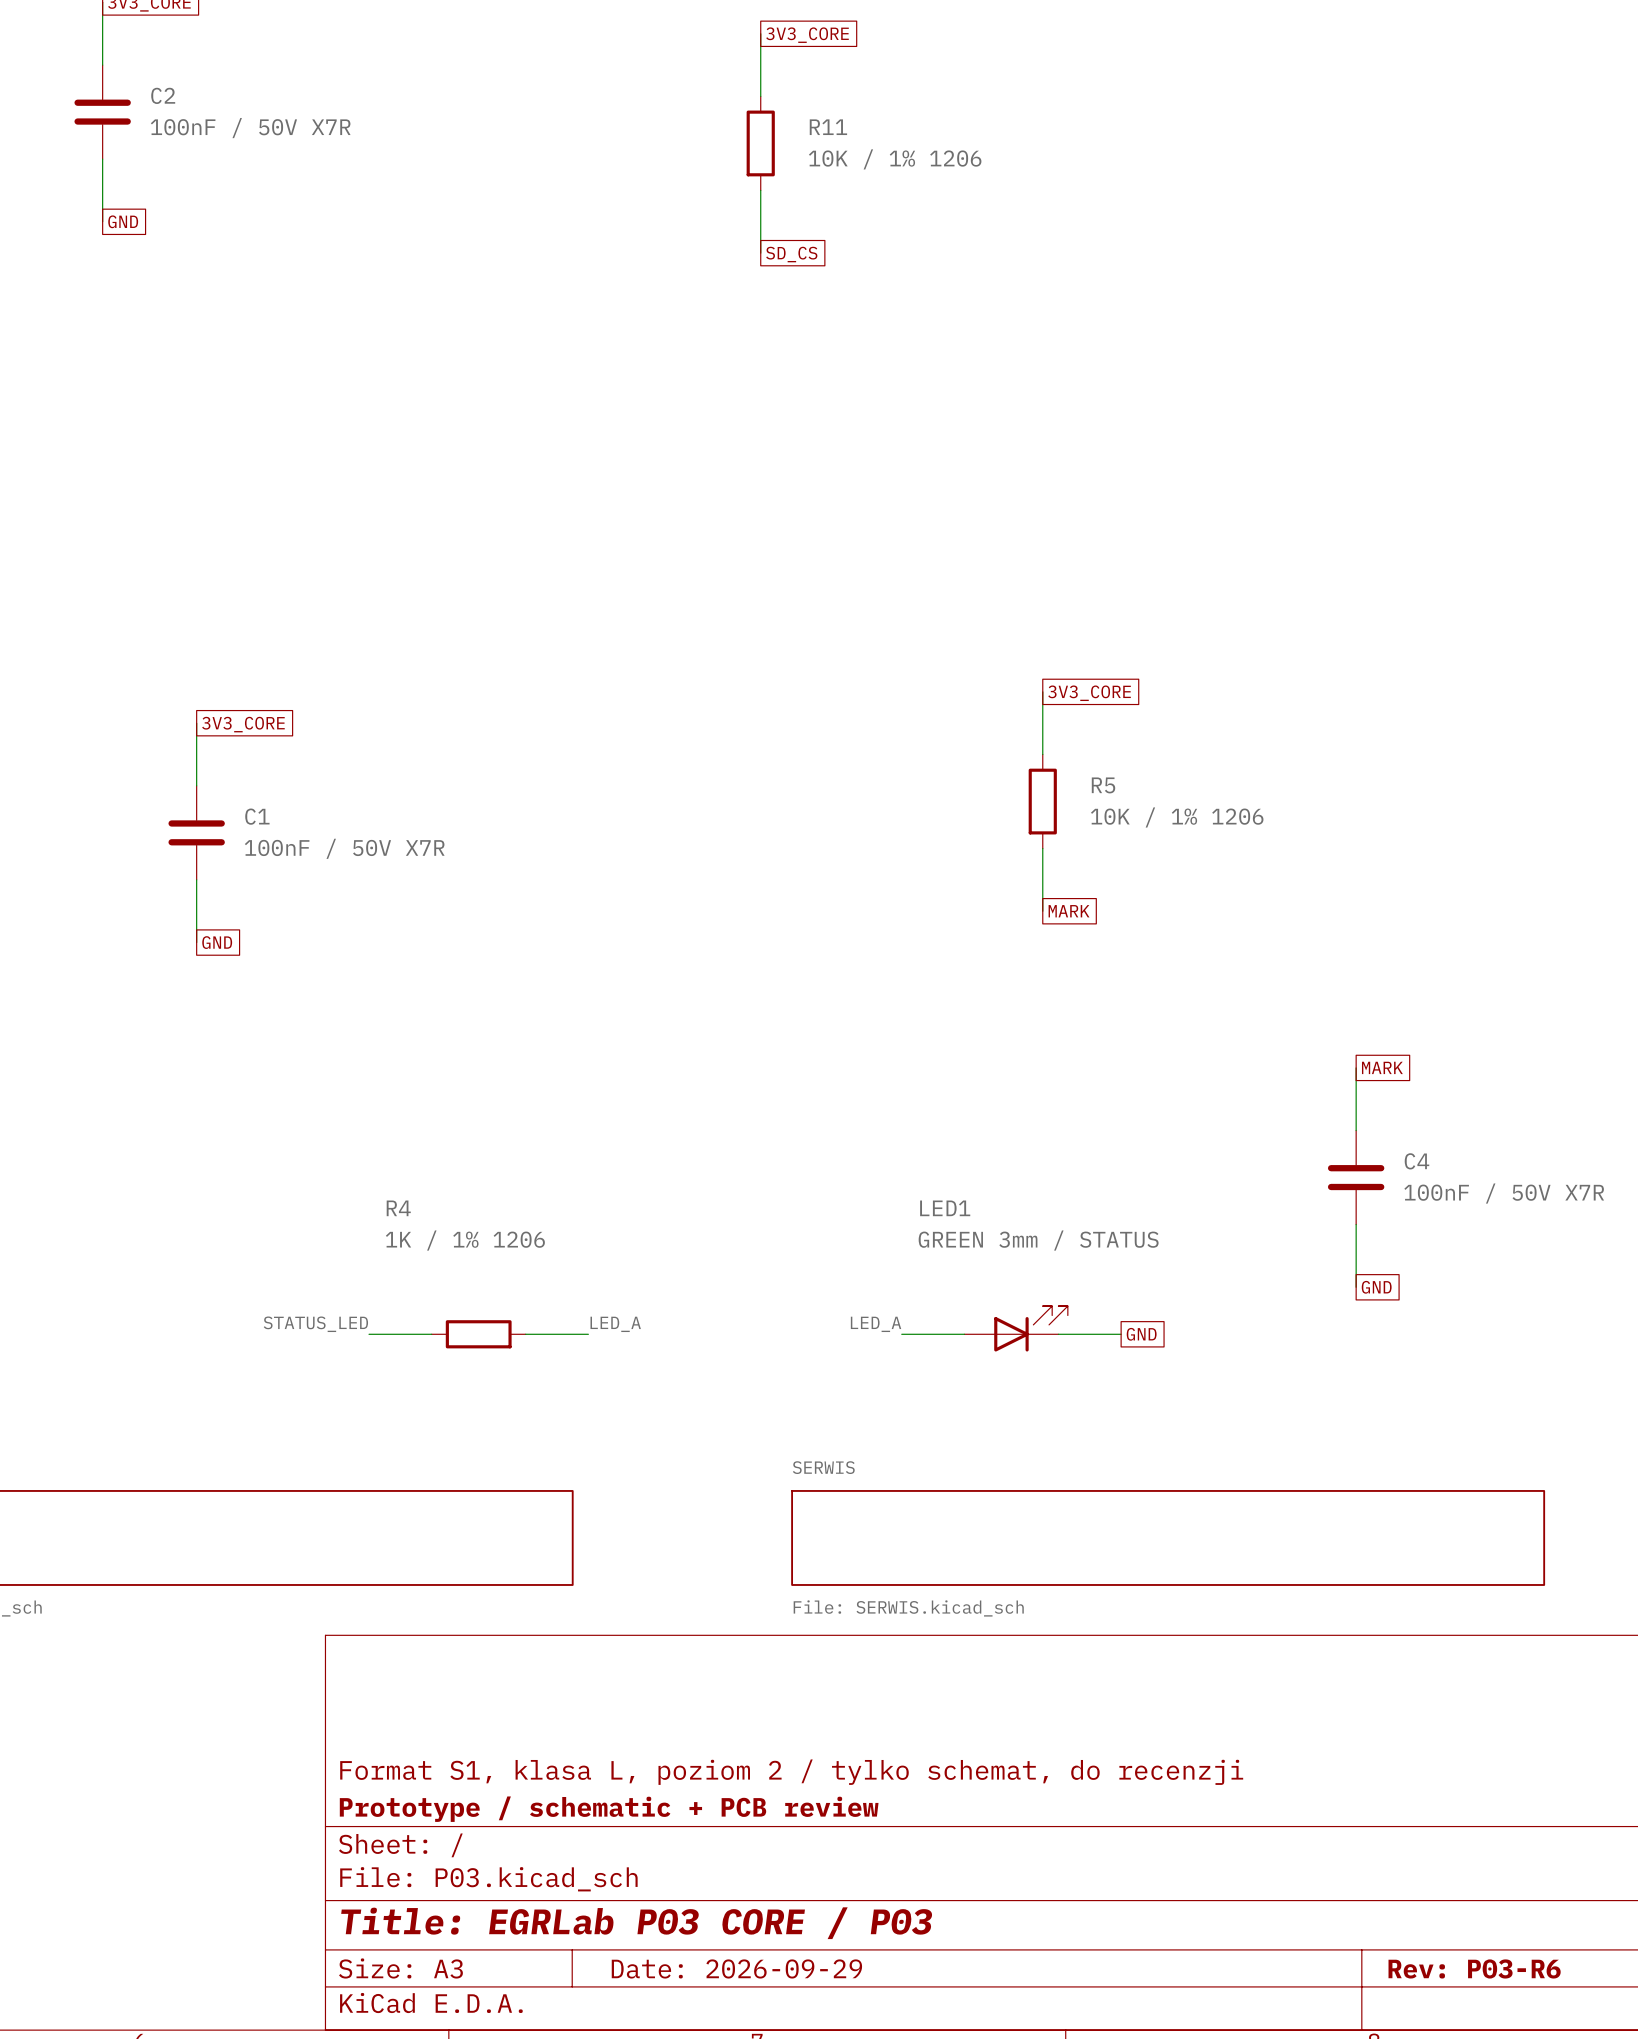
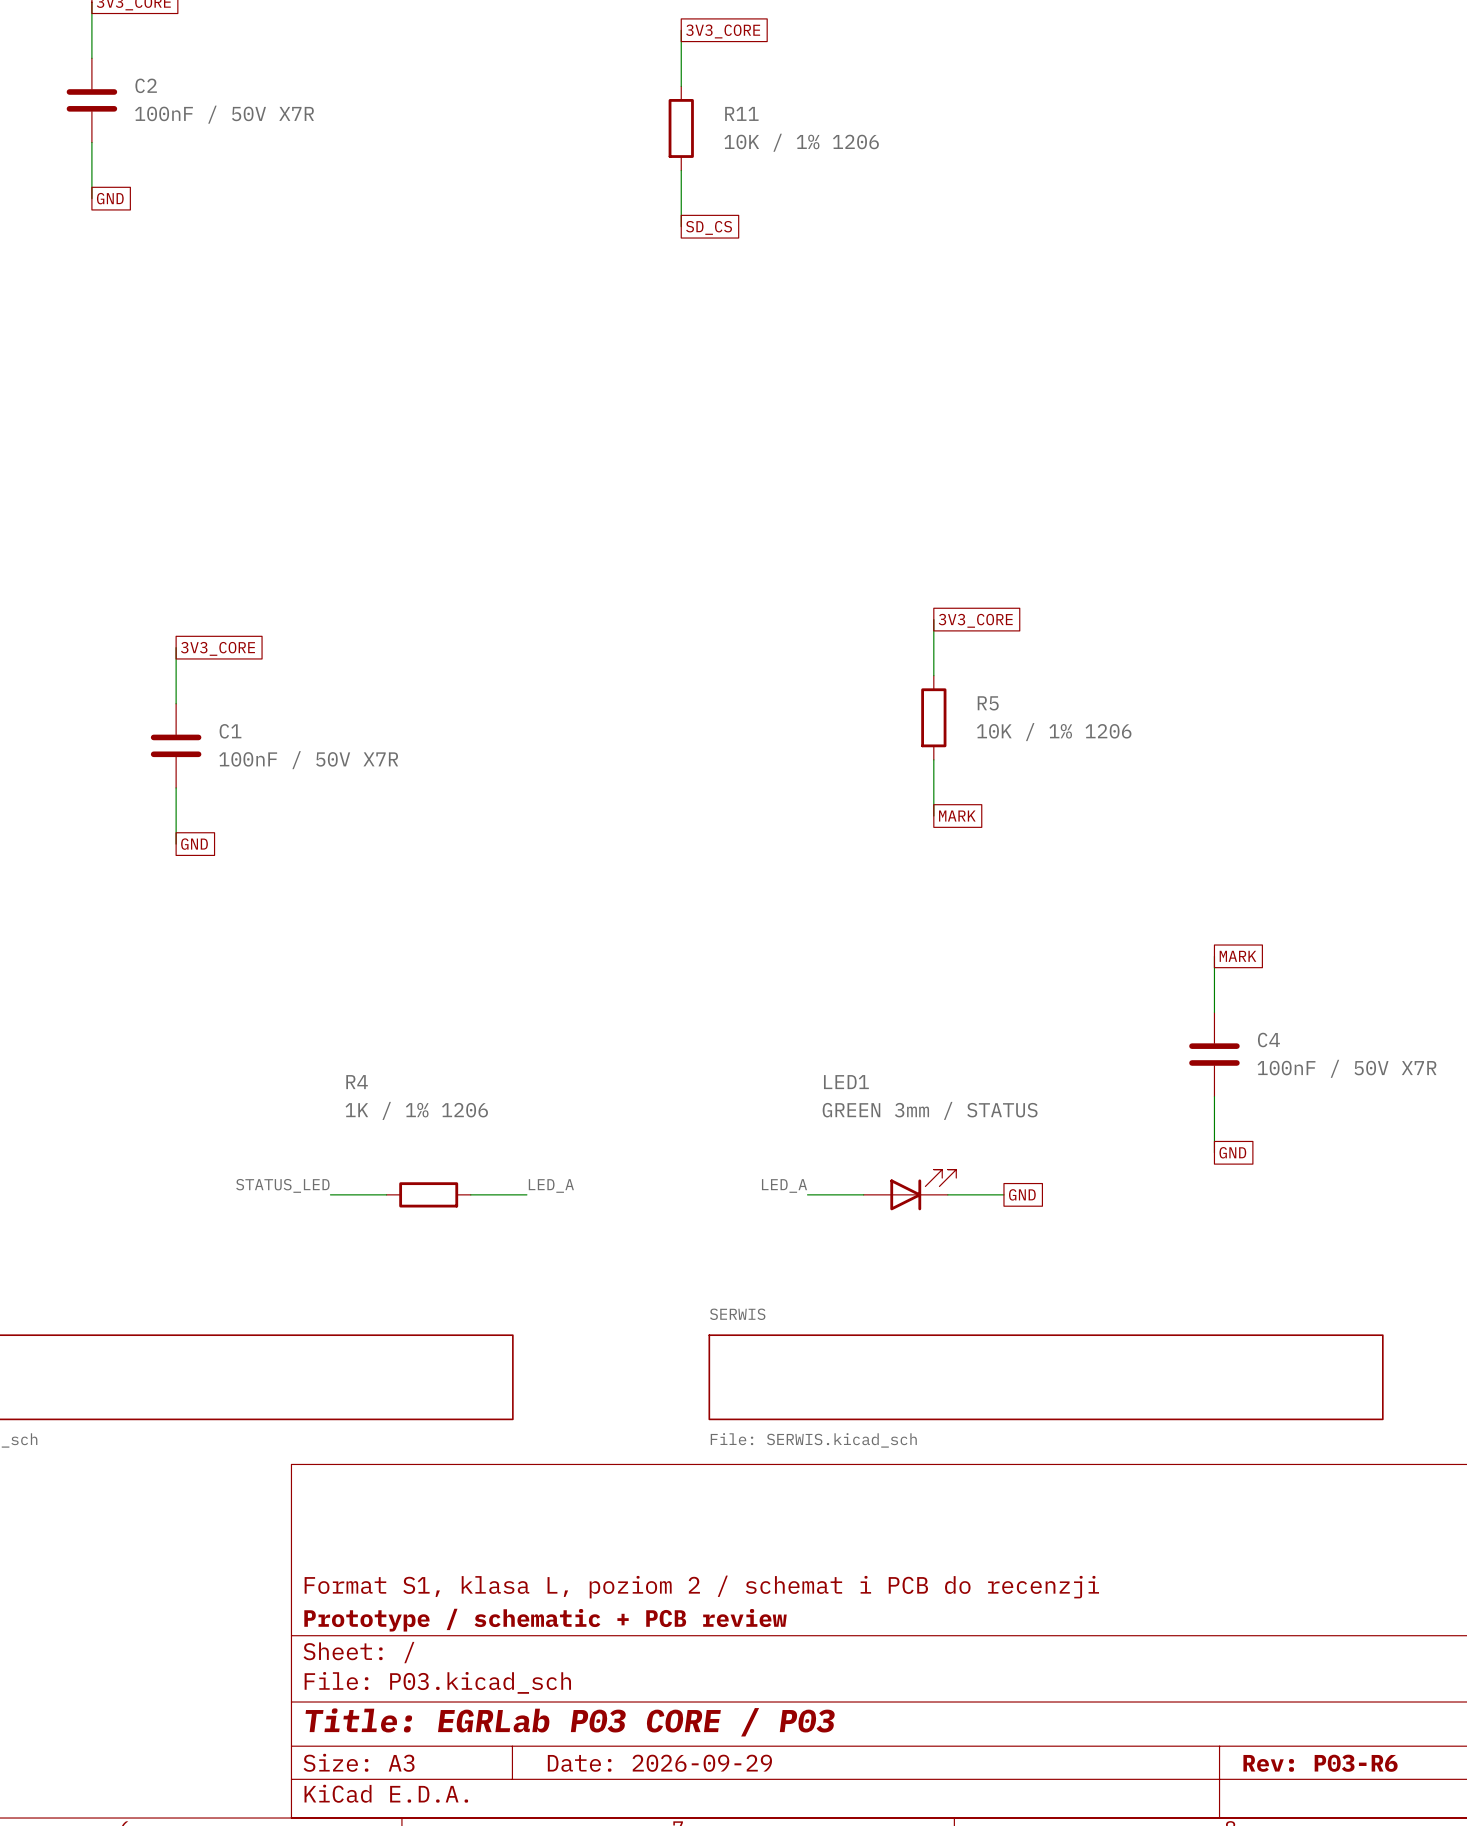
title block: Format S1, klasa L, poziom 2 / tylko schemat, do recenzji (791, 1772) -> Format S1, klasa L, poziom 2 / schemat i PCB do recenzji (701, 1587)

